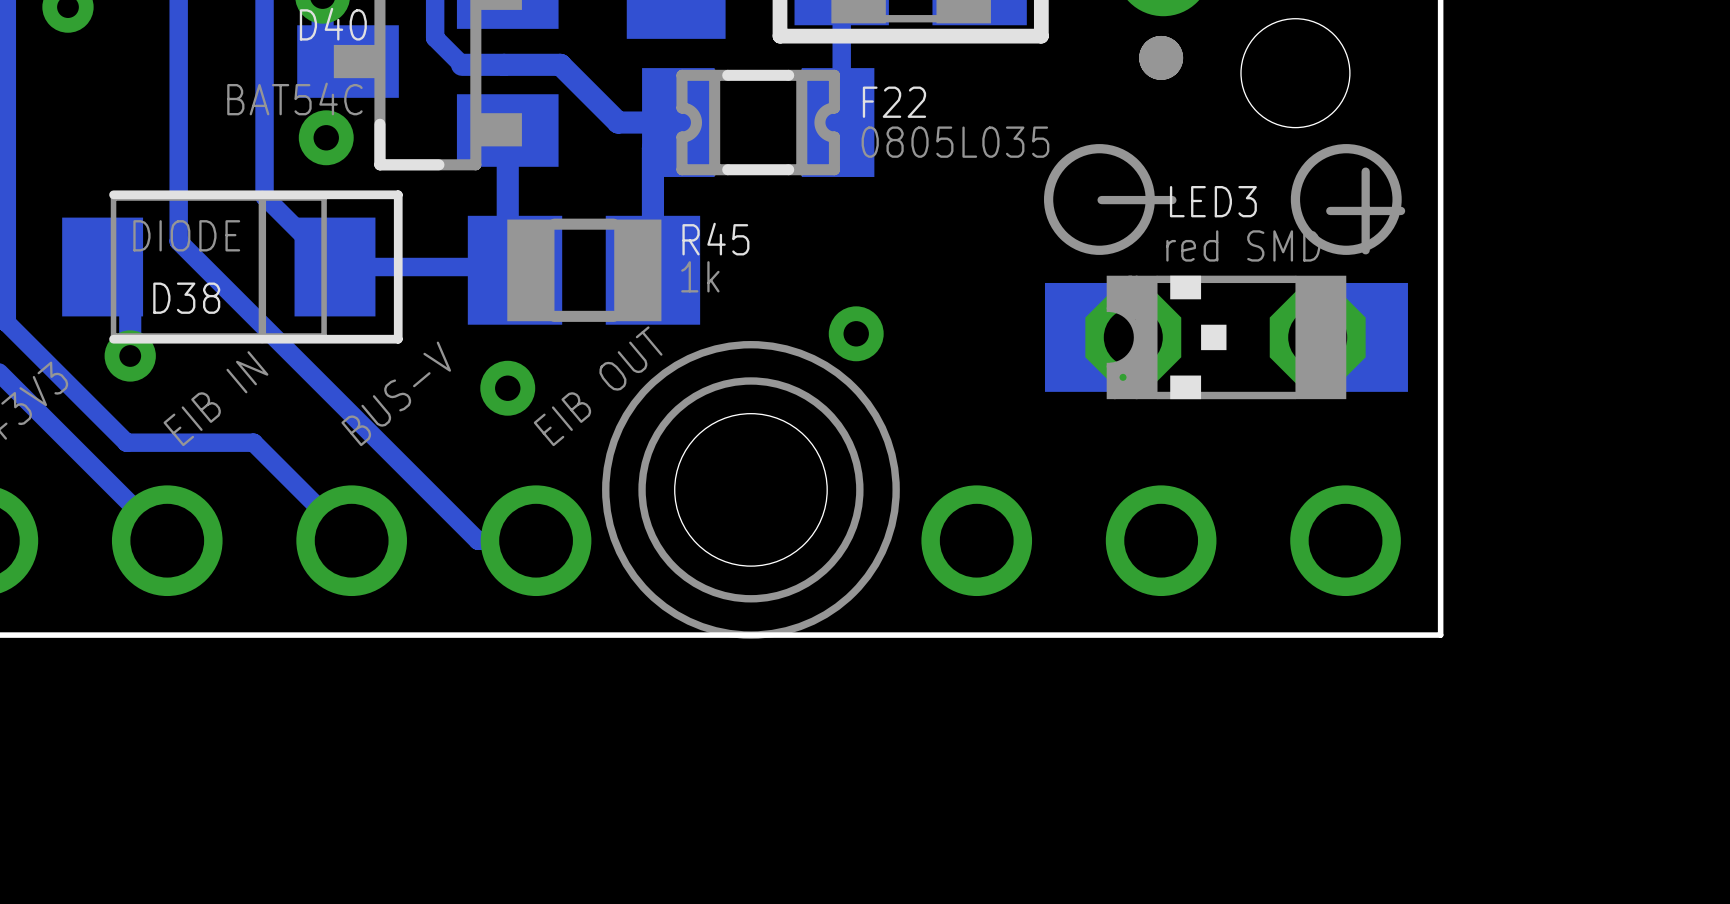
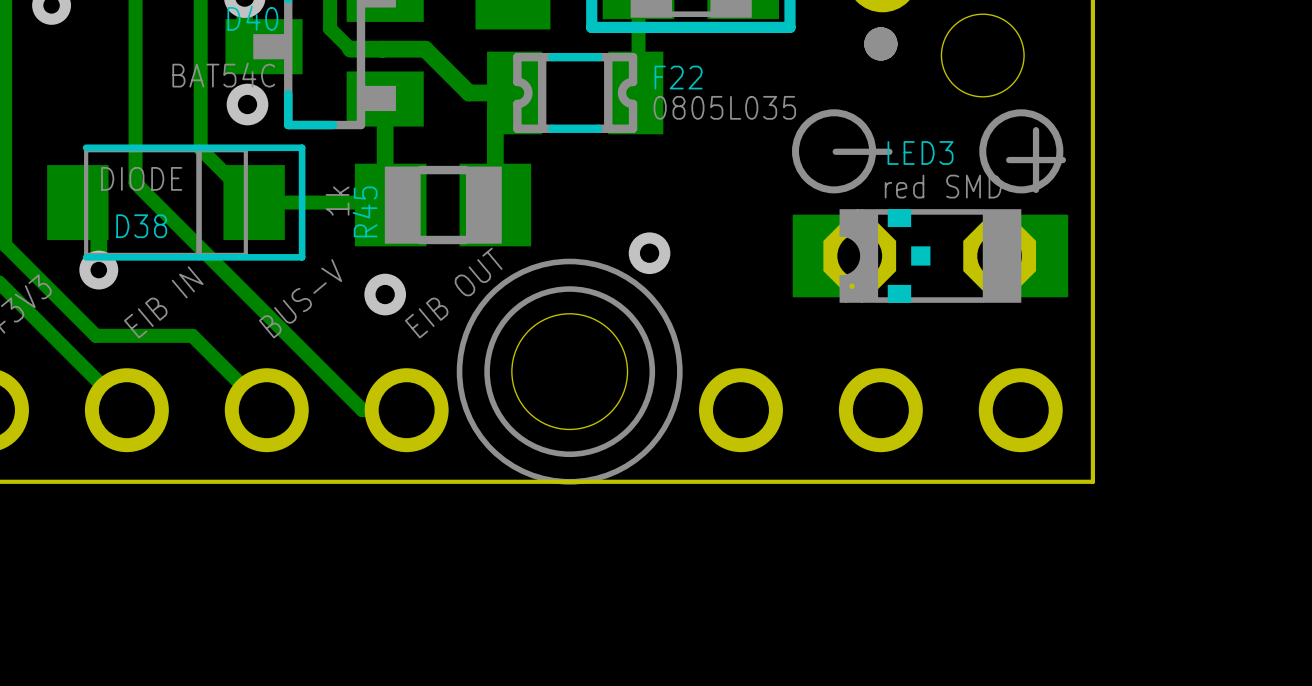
R45 name rotation: 0° (715, 239) -> 90° counterclockwise (365, 211)
R45 name position: R45 (715, 239) -> R45 (365, 211)
R45 value rotation: 0° (700, 276) -> 90° counterclockwise (337, 201)
R45 value position: 1k (700, 276) -> 1k (337, 201)

